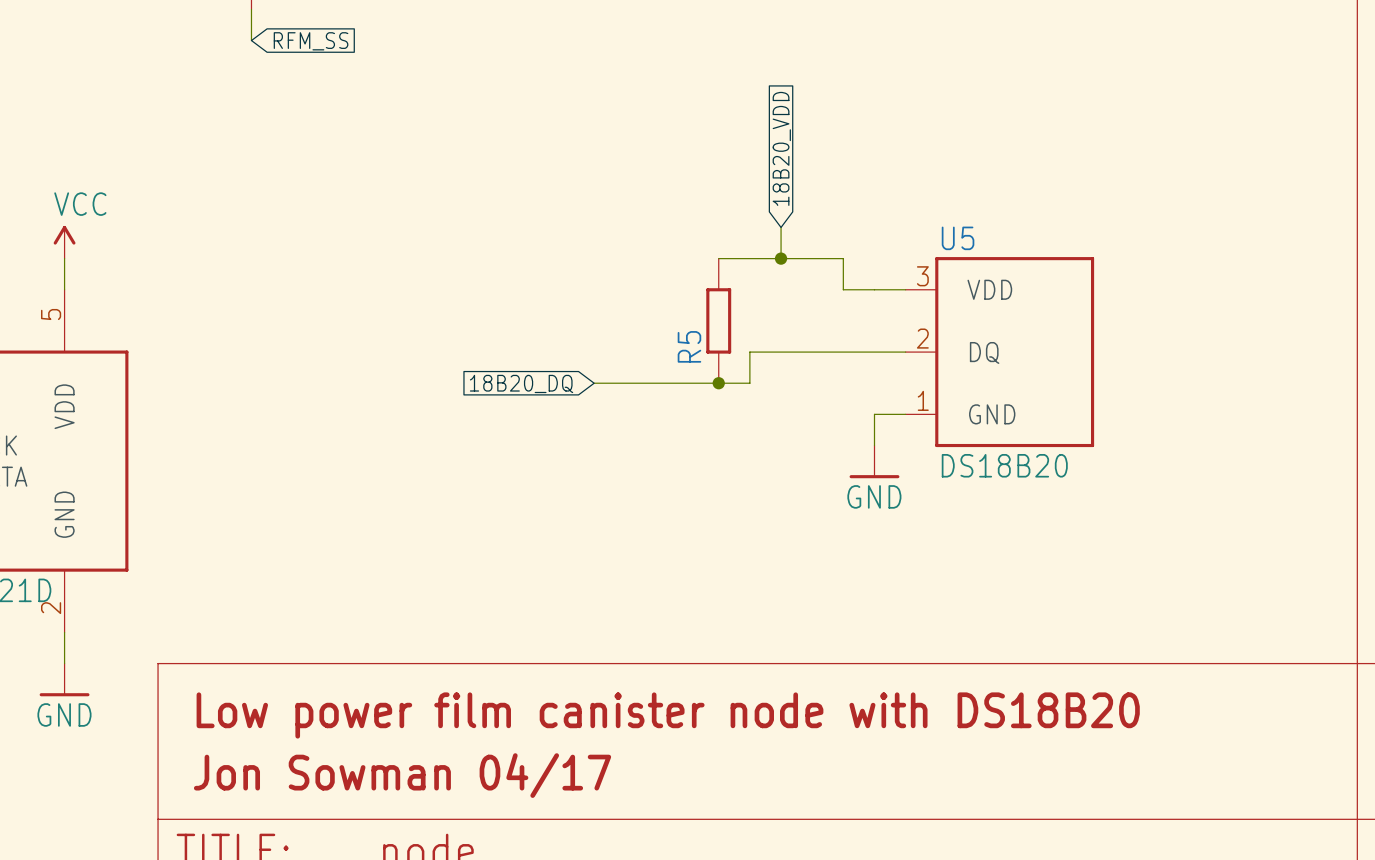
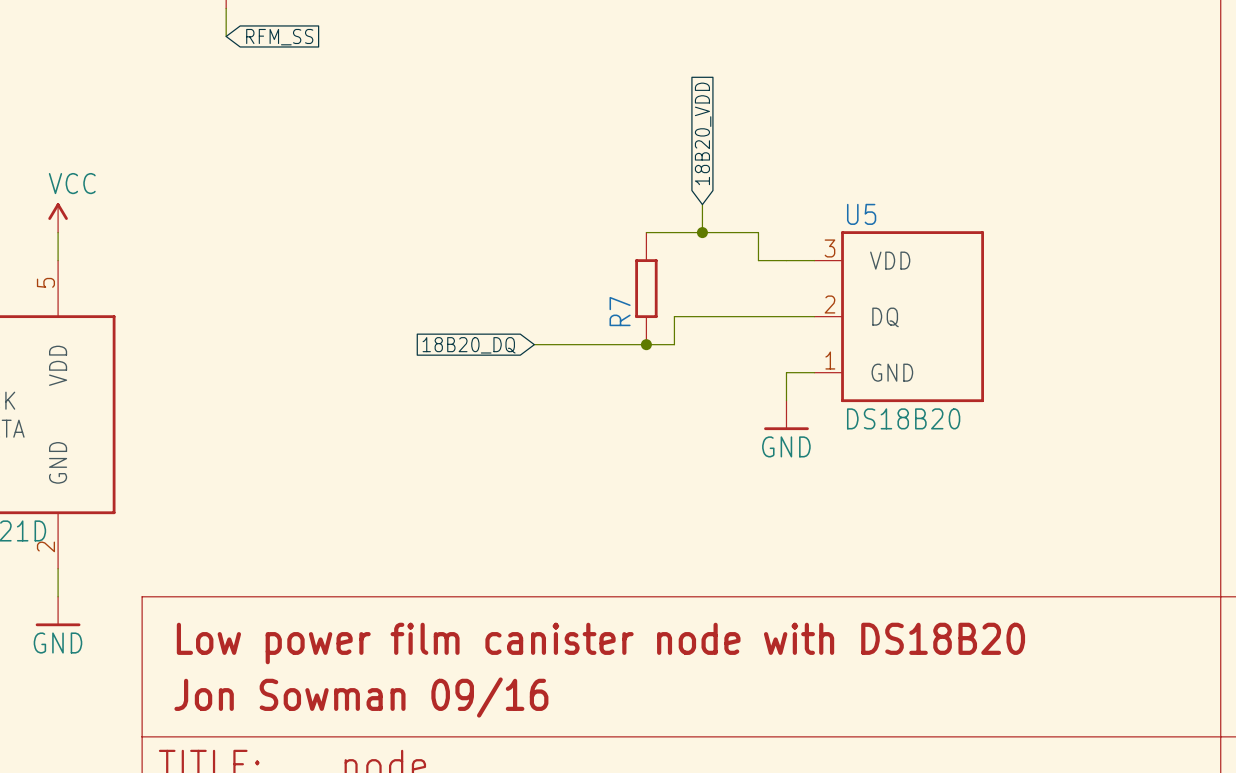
R5 name: R5 (689, 346) -> R7 (620, 311)
text: Jon Sowman 04/17 (402, 775) -> Jon Sowman 09/16 (361, 697)

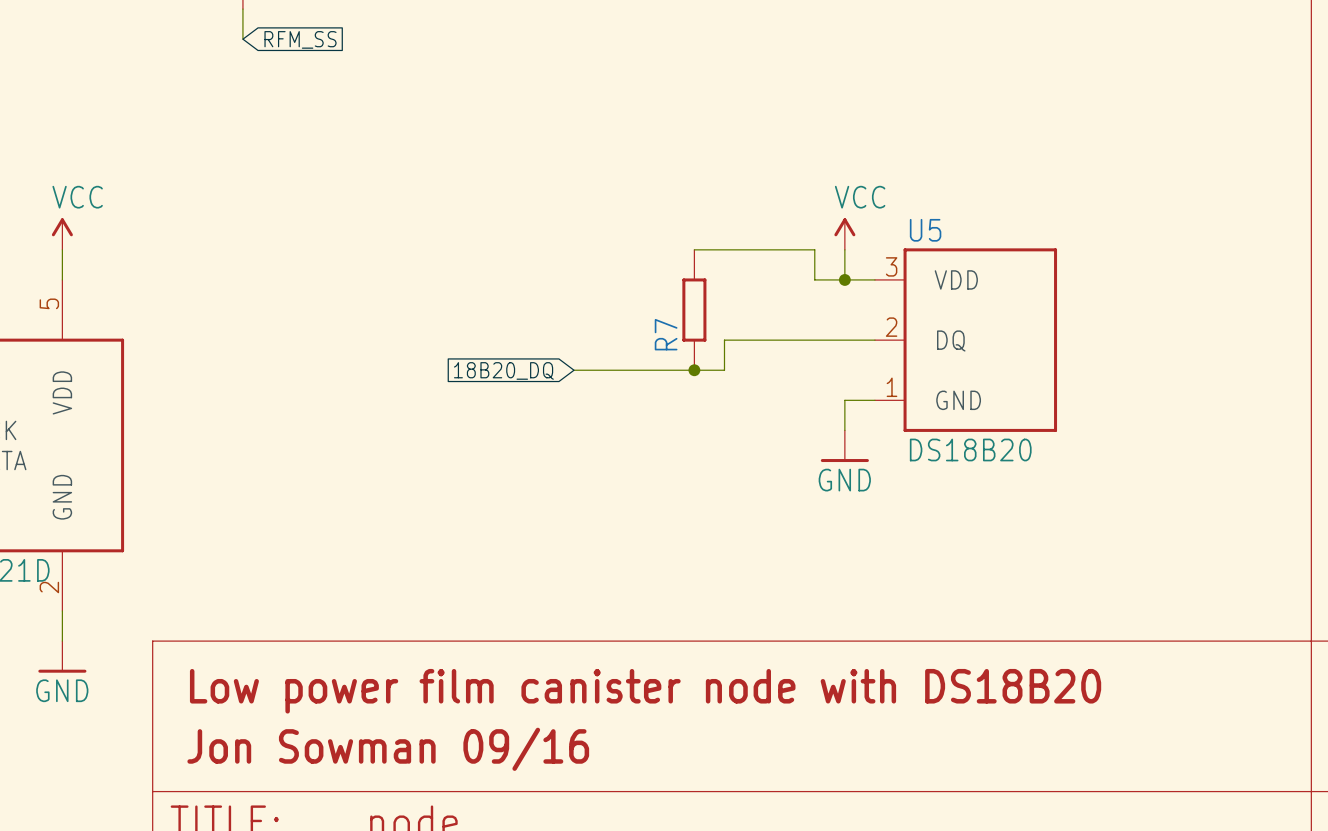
global label: 18B20_VDD (703, 133) -> none
wire: (702, 204) (702, 232) -> (844, 249) (844, 279)
power symbol: none -> VCC (844, 234)
junction: (702, 232) -> none
junction: none -> (844, 279)

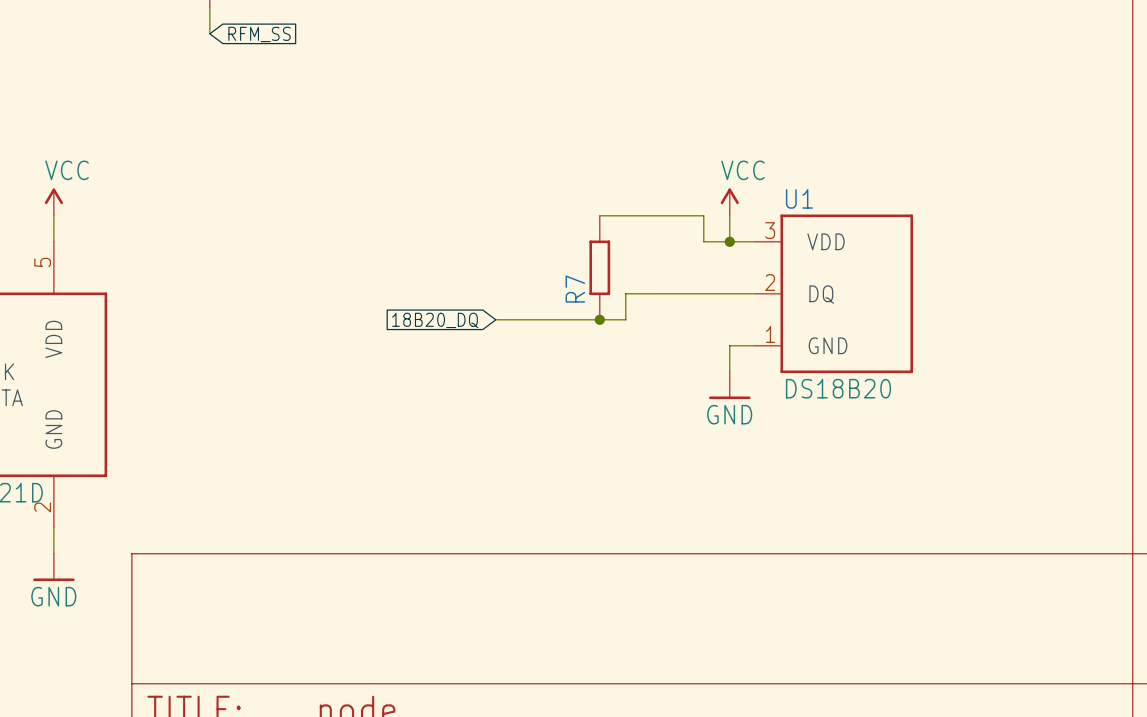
U5 name: U5 (925, 230) -> U1 (799, 198)
text: Low power film canister node with DS18B20 (645, 691) -> none
text: Jon Sowman 09/16 (388, 749) -> none

